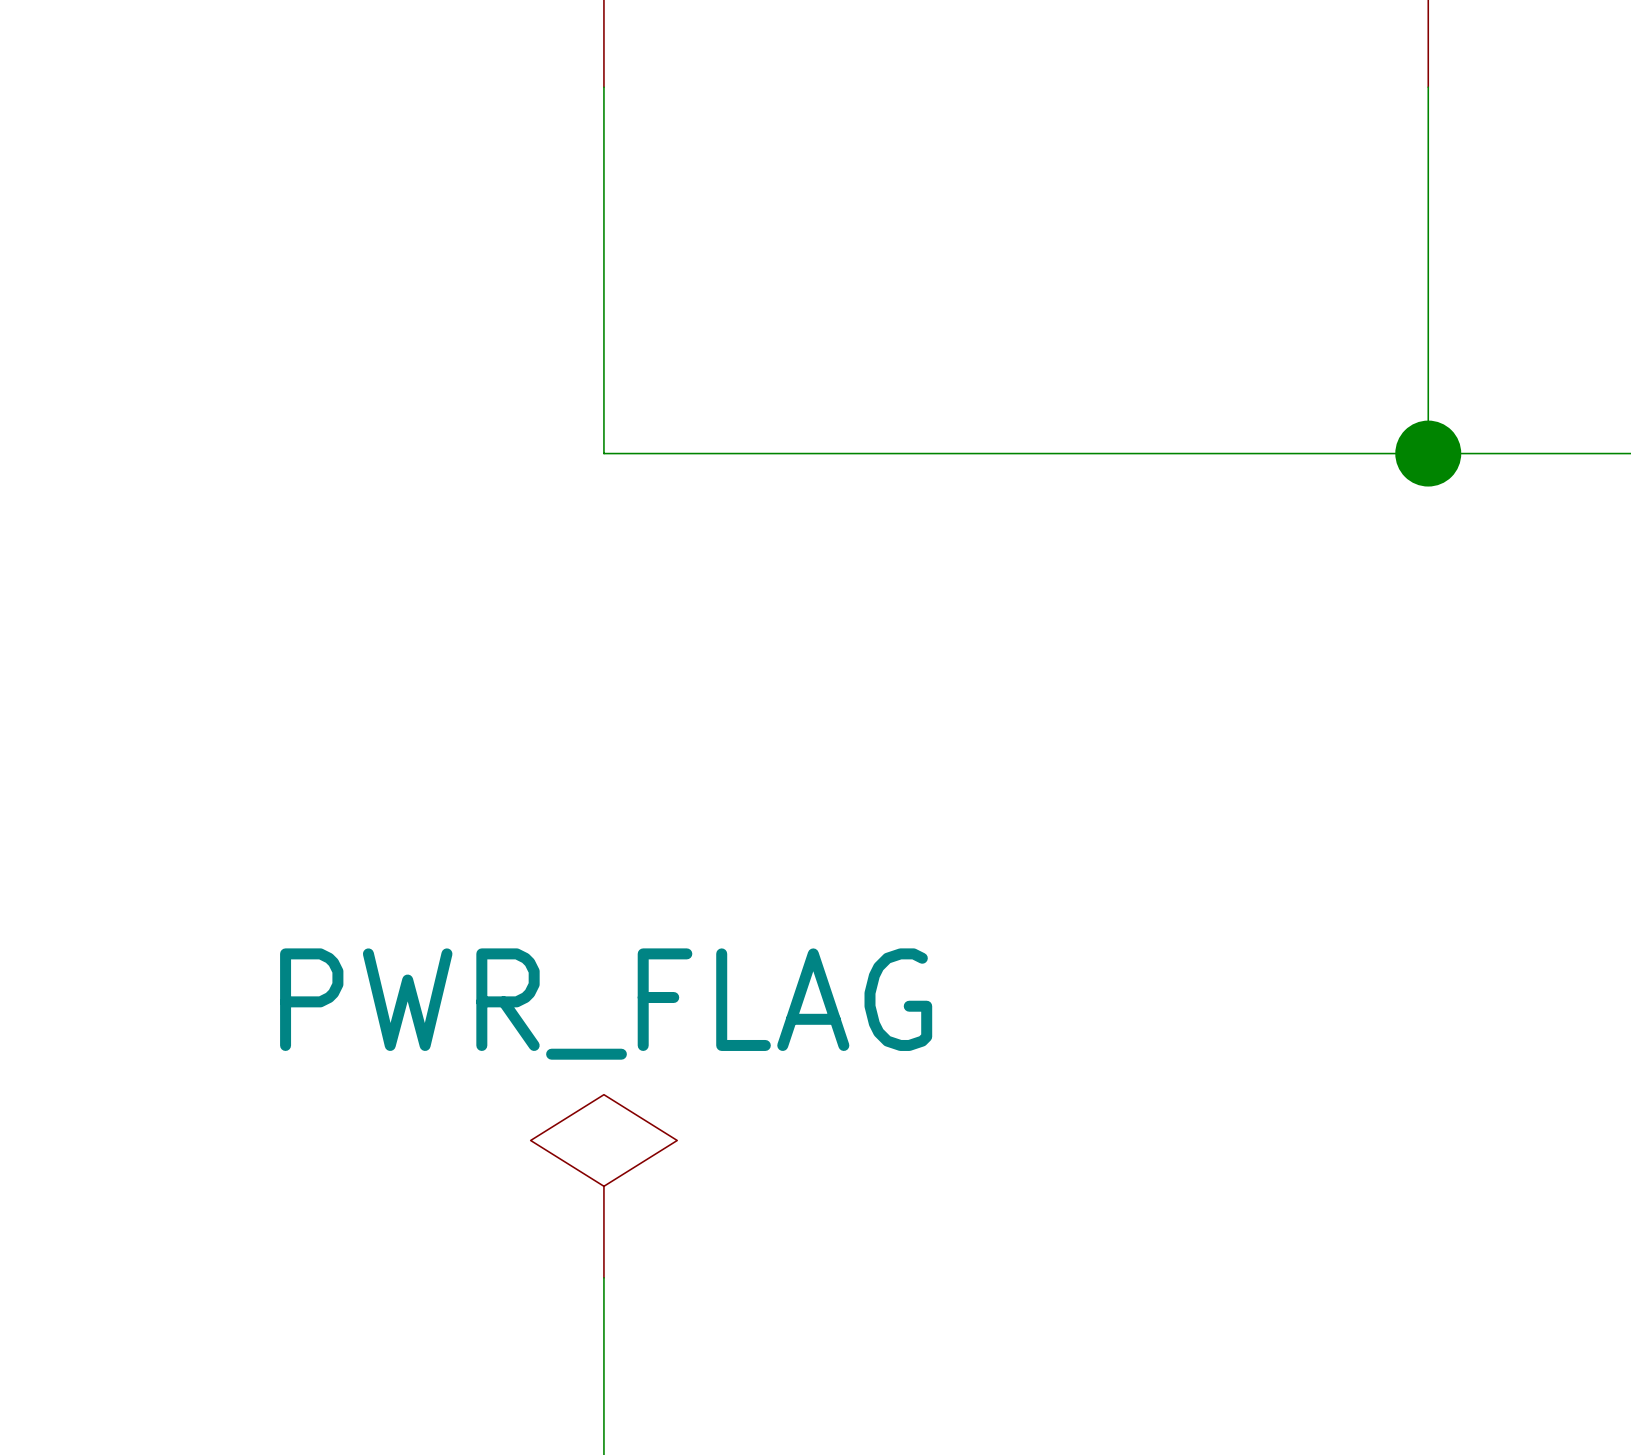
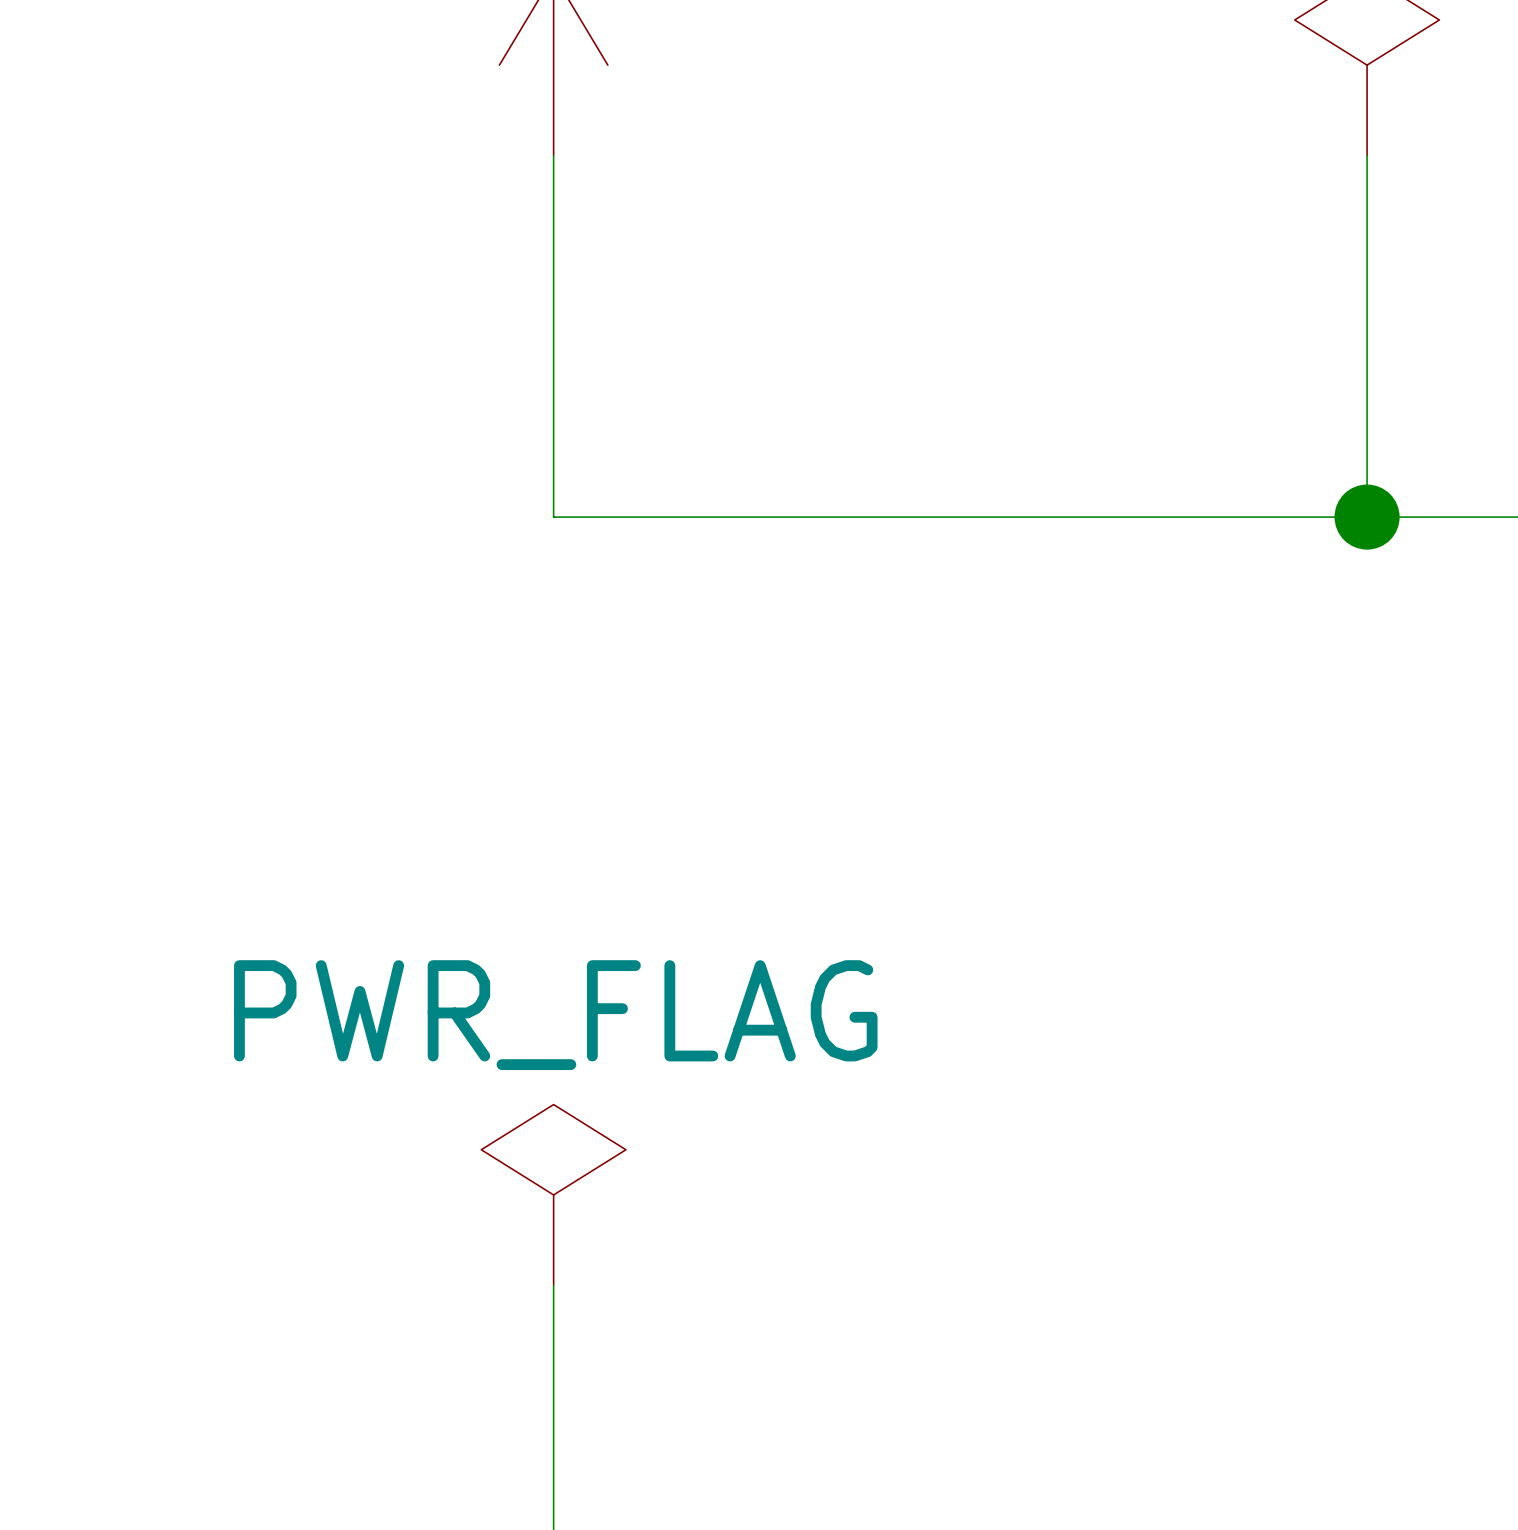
power symbol position: PWR_FLAG (603, 1186) -> PWR_FLAG (553, 1194)

